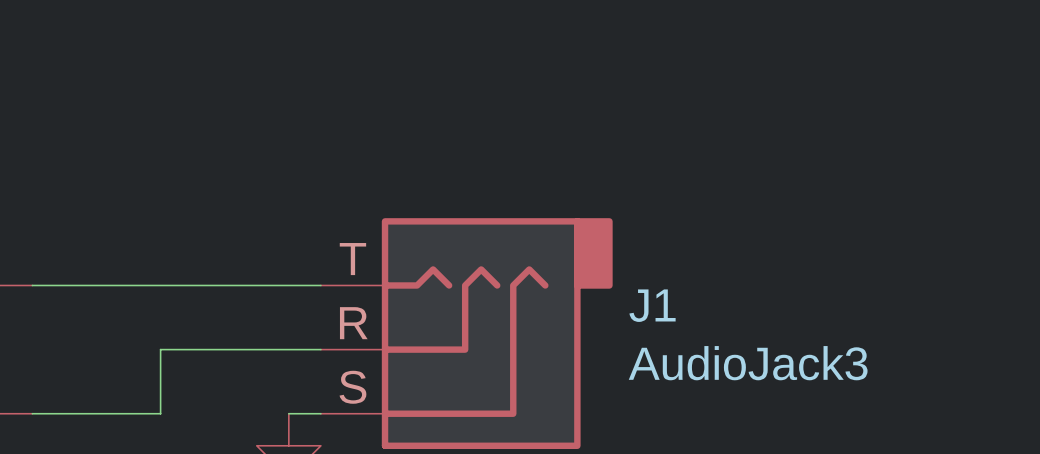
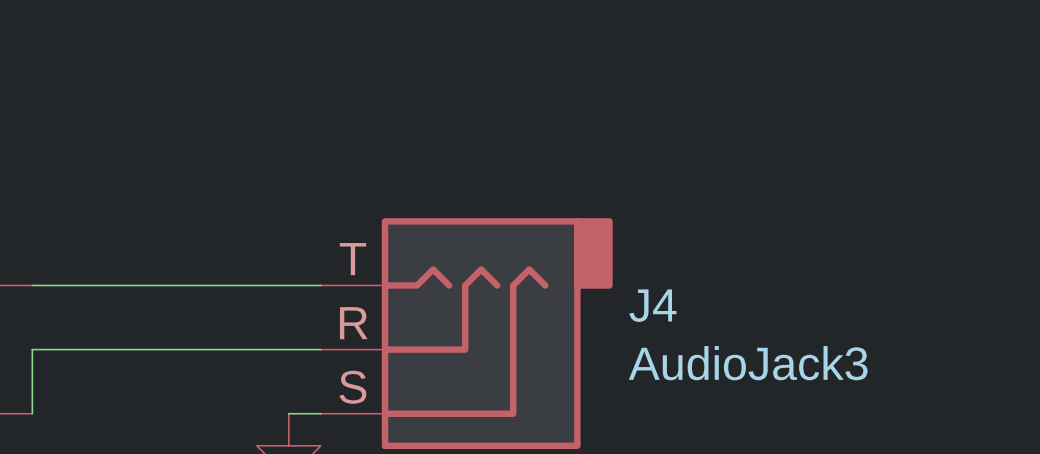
J1 name: J1 (652, 305) -> J4 (652, 305)
wire: (160, 349) (160, 413) (32, 413) -> (160, 349) (32, 349) (32, 413)

